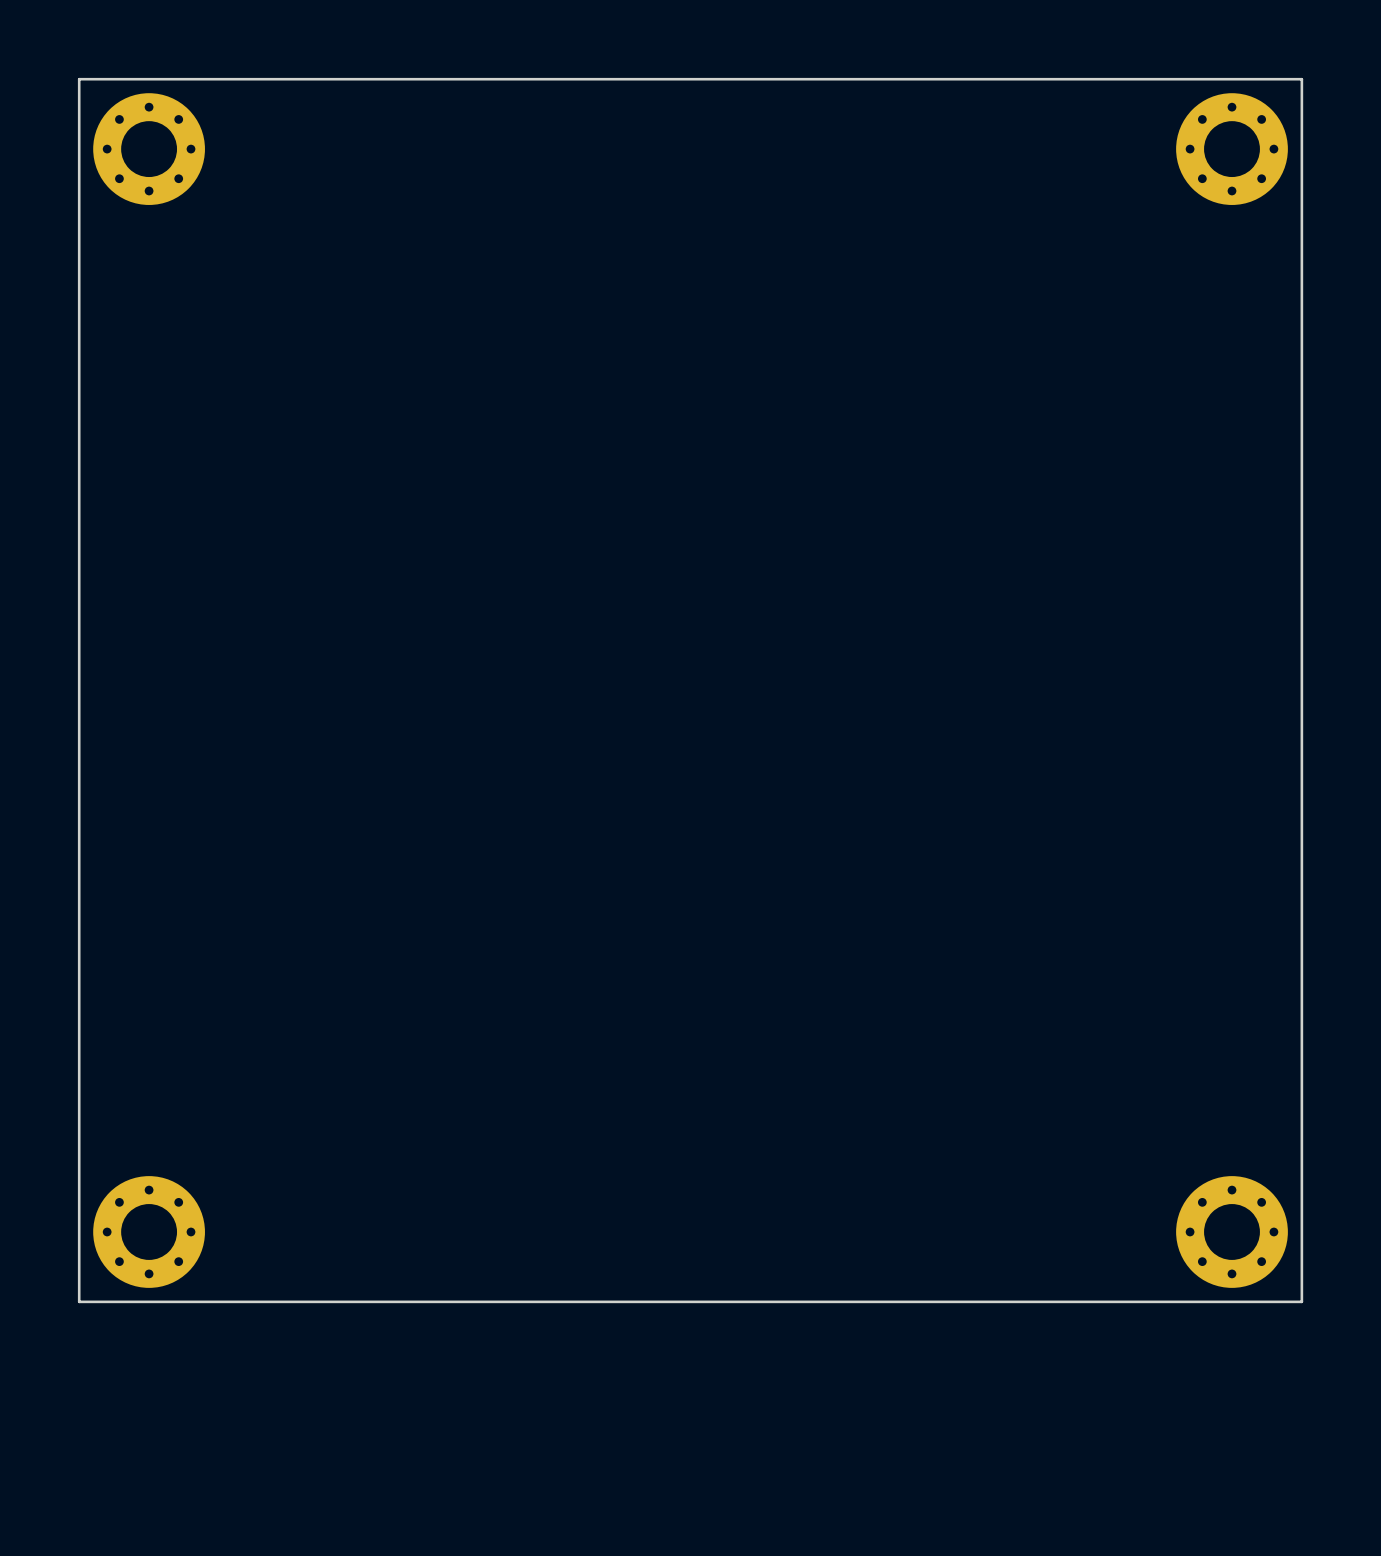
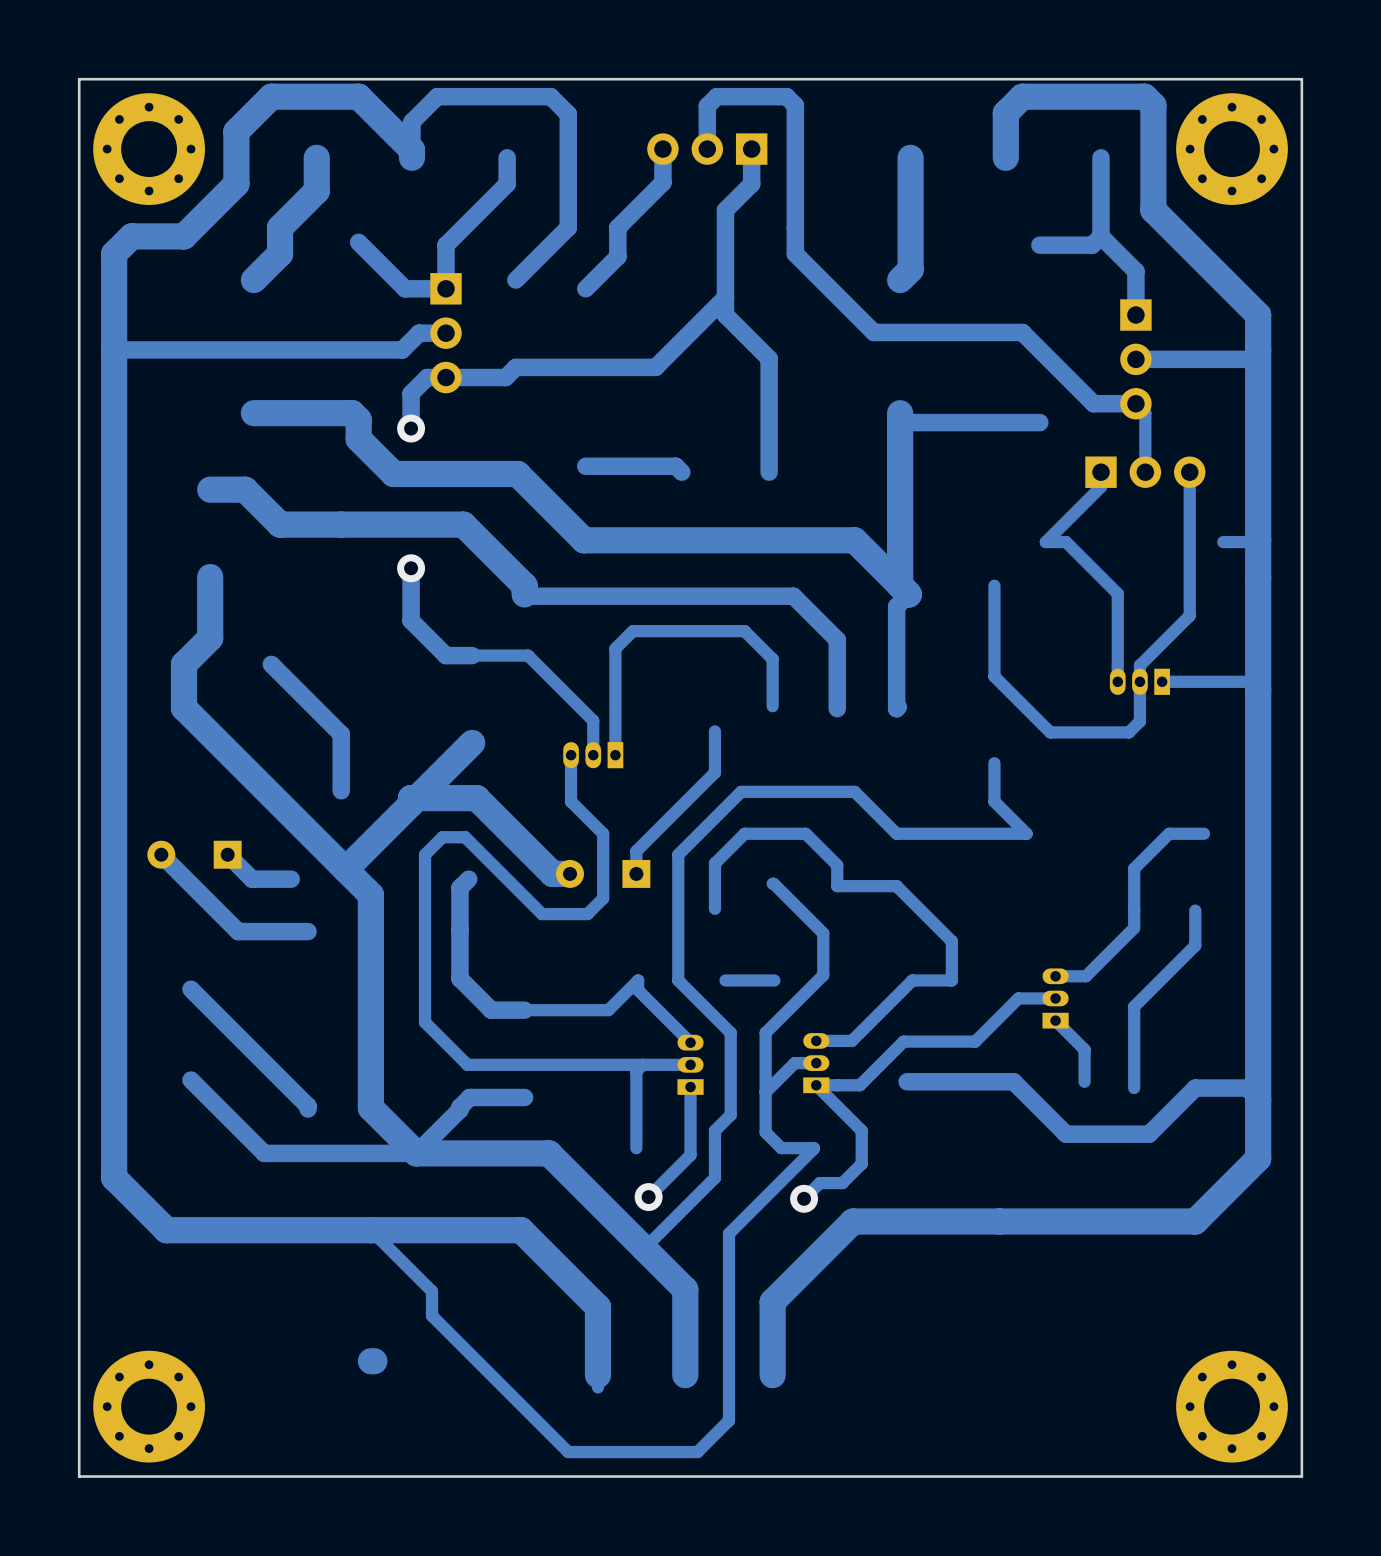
track: none -> (662, 149) (662, 182) (617, 227) (617, 256) (585, 288)
track: none -> (707, 149) (707, 106) (716, 96) (786, 96) (795, 105) (795, 253) (873, 332) (1022, 332) (1093, 403) (1135, 403) (1145, 413) (1145, 472)
part: none -> (707, 149)
track: none -> (751, 149) (751, 184) (725, 210) (725, 315) (769, 358) (769, 472)
track: none -> (316, 157) (316, 191) (280, 227) (280, 253) (253, 280)
track: none -> (507, 157) (507, 184) (446, 245) (446, 288) (405, 288) (358, 242)
track: none -> (910, 157) (910, 269) (900, 280)
track: none -> (1005, 157) (1005, 113) (1022, 96) (1144, 96) (1153, 105) (1153, 210) (1258, 315) (1258, 1158) (1195, 1221) (852, 1221) (772, 1301) (772, 1375)
track: none -> (1100, 157) (1100, 236)
track: none -> (1100, 236) (1135, 271) (1135, 315)
track: none -> (1100, 236) (1092, 245) (1039, 245)
track: none -> (515, 280) (568, 227) (568, 114) (550, 96) (437, 96) (411, 122) (411, 157) (411, 149) (358, 96) (271, 96) (236, 131) (236, 184) (184, 236) (131, 236) (114, 253) (114, 1177) (166, 1230) (521, 1230) (597, 1307) (597, 1387)
track: none -> (725, 297) (655, 367) (515, 367) (505, 377) (427, 377) (411, 393) (411, 428)
track: none -> (446, 333) (419, 333) (402, 349) (114, 349)
part: none -> (446, 333)
track: none -> (1258, 349) (1258, 359) (1135, 359)
part: none -> (1135, 359)
track: none -> (352, 413) (253, 413)
track: none -> (358, 419) (358, 439) (393, 473) (517, 473) (583, 540) (854, 540) (908, 594) (896, 606) (896, 708) (898, 706)
track: none -> (1039, 422) (909, 422) (900, 413) (900, 585)
via: none -> (411, 428)
track: none -> (585, 466) (675, 466) (681, 472)
track: none -> (1100, 472) (1100, 486) (1045, 542) (1066, 542) (1117, 593) (1117, 681)
part: none -> (1145, 472)
track: none -> (1189, 472) (1189, 615) (1139, 665) (1139, 721) (1128, 732) (1050, 732) (994, 676) (994, 585)
track: none -> (210, 489) (245, 489) (280, 524) (463, 524) (524, 585) (526, 596) (793, 596) (837, 639) (837, 708)
track: none -> (1256, 540) (1258, 542) (1223, 542)
track: none -> (411, 568) (411, 620) (446, 655) (528, 655) (593, 720) (593, 755)
via: none -> (411, 568)
track: none -> (210, 577) (210, 638) (184, 664) (184, 708) (370, 894) (370, 1107) (416, 1153)
track: none -> (271, 664) (341, 734) (341, 790)
part: none -> (1139, 681)
track: none -> (1162, 681) (1249, 681) (1258, 690)
track: none -> (772, 706) (772, 659) (744, 631) (632, 631) (615, 648) (615, 755)
track: none -> (714, 731) (714, 772) (636, 851) (636, 873)
track: none -> (466, 742) (472, 742) (417, 798)
track: none -> (571, 755) (571, 801) (603, 833) (603, 898) (587, 914) (542, 914) (465, 837) (442, 837) (425, 854) (425, 1022) (467, 1064) (690, 1064)
part: none -> (593, 755)
track: none -> (994, 763) (994, 801) (1026, 833) (896, 833) (854, 791) (741, 791) (678, 854) (678, 980) (730, 1032) (730, 1114) (714, 1130) (714, 1177) (644, 1248)
track: none -> (1204, 833) (1169, 833) (1134, 868) (1134, 928) (1085, 976) (1055, 976)
track: none -> (161, 854) (238, 931) (308, 931)
part: none -> (194, 854)
track: none -> (227, 854) (252, 879) (291, 879)
track: none -> (345, 869) (411, 804) (411, 798) (476, 798) (552, 873) (570, 873)
part: none -> (603, 873)
track: none -> (468, 879) (459, 887) (459, 978) (491, 1010) (608, 1010) (638, 980) (638, 990) (690, 1042)
track: none -> (772, 883) (823, 933) (823, 975) (765, 1032) (765, 1132) (781, 1148) (813, 1148) (728, 1233) (728, 1420) (697, 1452) (568, 1452) (432, 1315) (432, 1291) (370, 1230)
track: none -> (714, 908) (714, 863) (744, 833) (805, 833) (837, 865) (837, 886) (896, 886) (951, 941) (951, 980) (912, 980) (851, 1040) (816, 1040)
track: none -> (1195, 910) (1195, 945) (1134, 1006) (1134, 1088)
track: none -> (774, 980) (725, 980)
track: none -> (191, 989) (308, 1106) (308, 1109)
track: none -> (1055, 998) (1018, 998) (975, 1041) (903, 1041) (859, 1085) (816, 1085) (861, 1130) (861, 1163) (842, 1183) (819, 1183) (804, 1198)
part: none -> (1055, 998)
track: none -> (1055, 1020) (1084, 1049) (1084, 1081)
track: none -> (816, 1063) (794, 1063) (765, 1092)
part: none -> (816, 1063)
track: none -> (642, 1064) (636, 1071) (636, 1148)
part: none -> (690, 1064)
track: none -> (191, 1080) (264, 1153) (416, 1153)
track: none -> (907, 1081) (1013, 1081) (1066, 1134) (1149, 1134) (1195, 1088) (1247, 1088) (1258, 1099)
track: none -> (690, 1087) (690, 1155) (648, 1197)
track: none -> (524, 1097) (469, 1097) (416, 1153)
track: none -> (416, 1153) (549, 1153) (685, 1289) (685, 1375)
via: none -> (648, 1197)
via: none -> (804, 1198)
part position: (149, 1231) -> (149, 1406)
part position: (1231, 1231) -> (1231, 1406)
board edge: (1301, 1301) (79, 1301) -> (1301, 1301) (1301, 1476) (79, 1476) (79, 1301)
track: none -> (374, 1361) (370, 1361)

